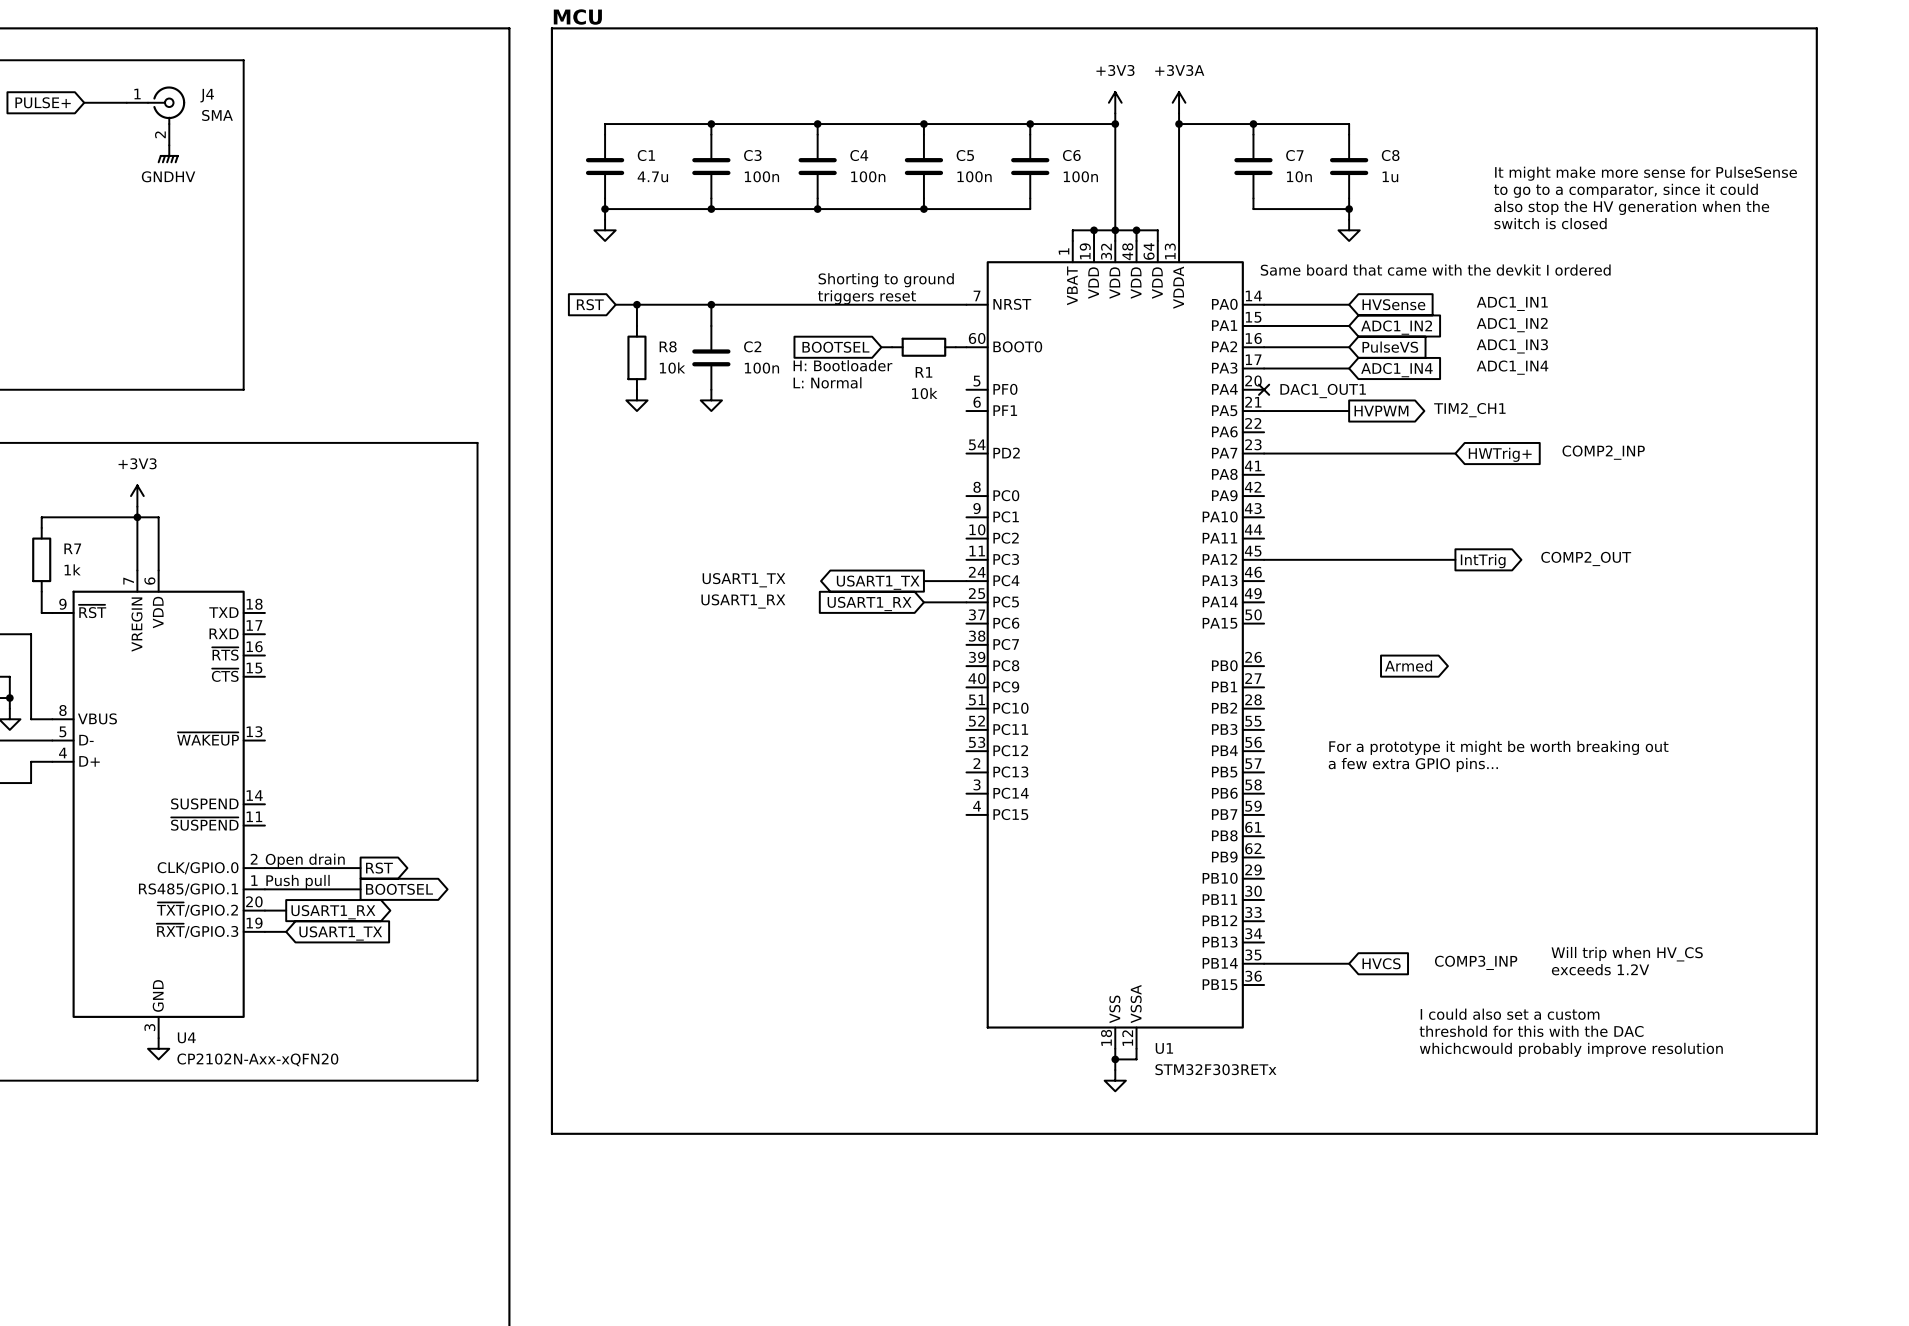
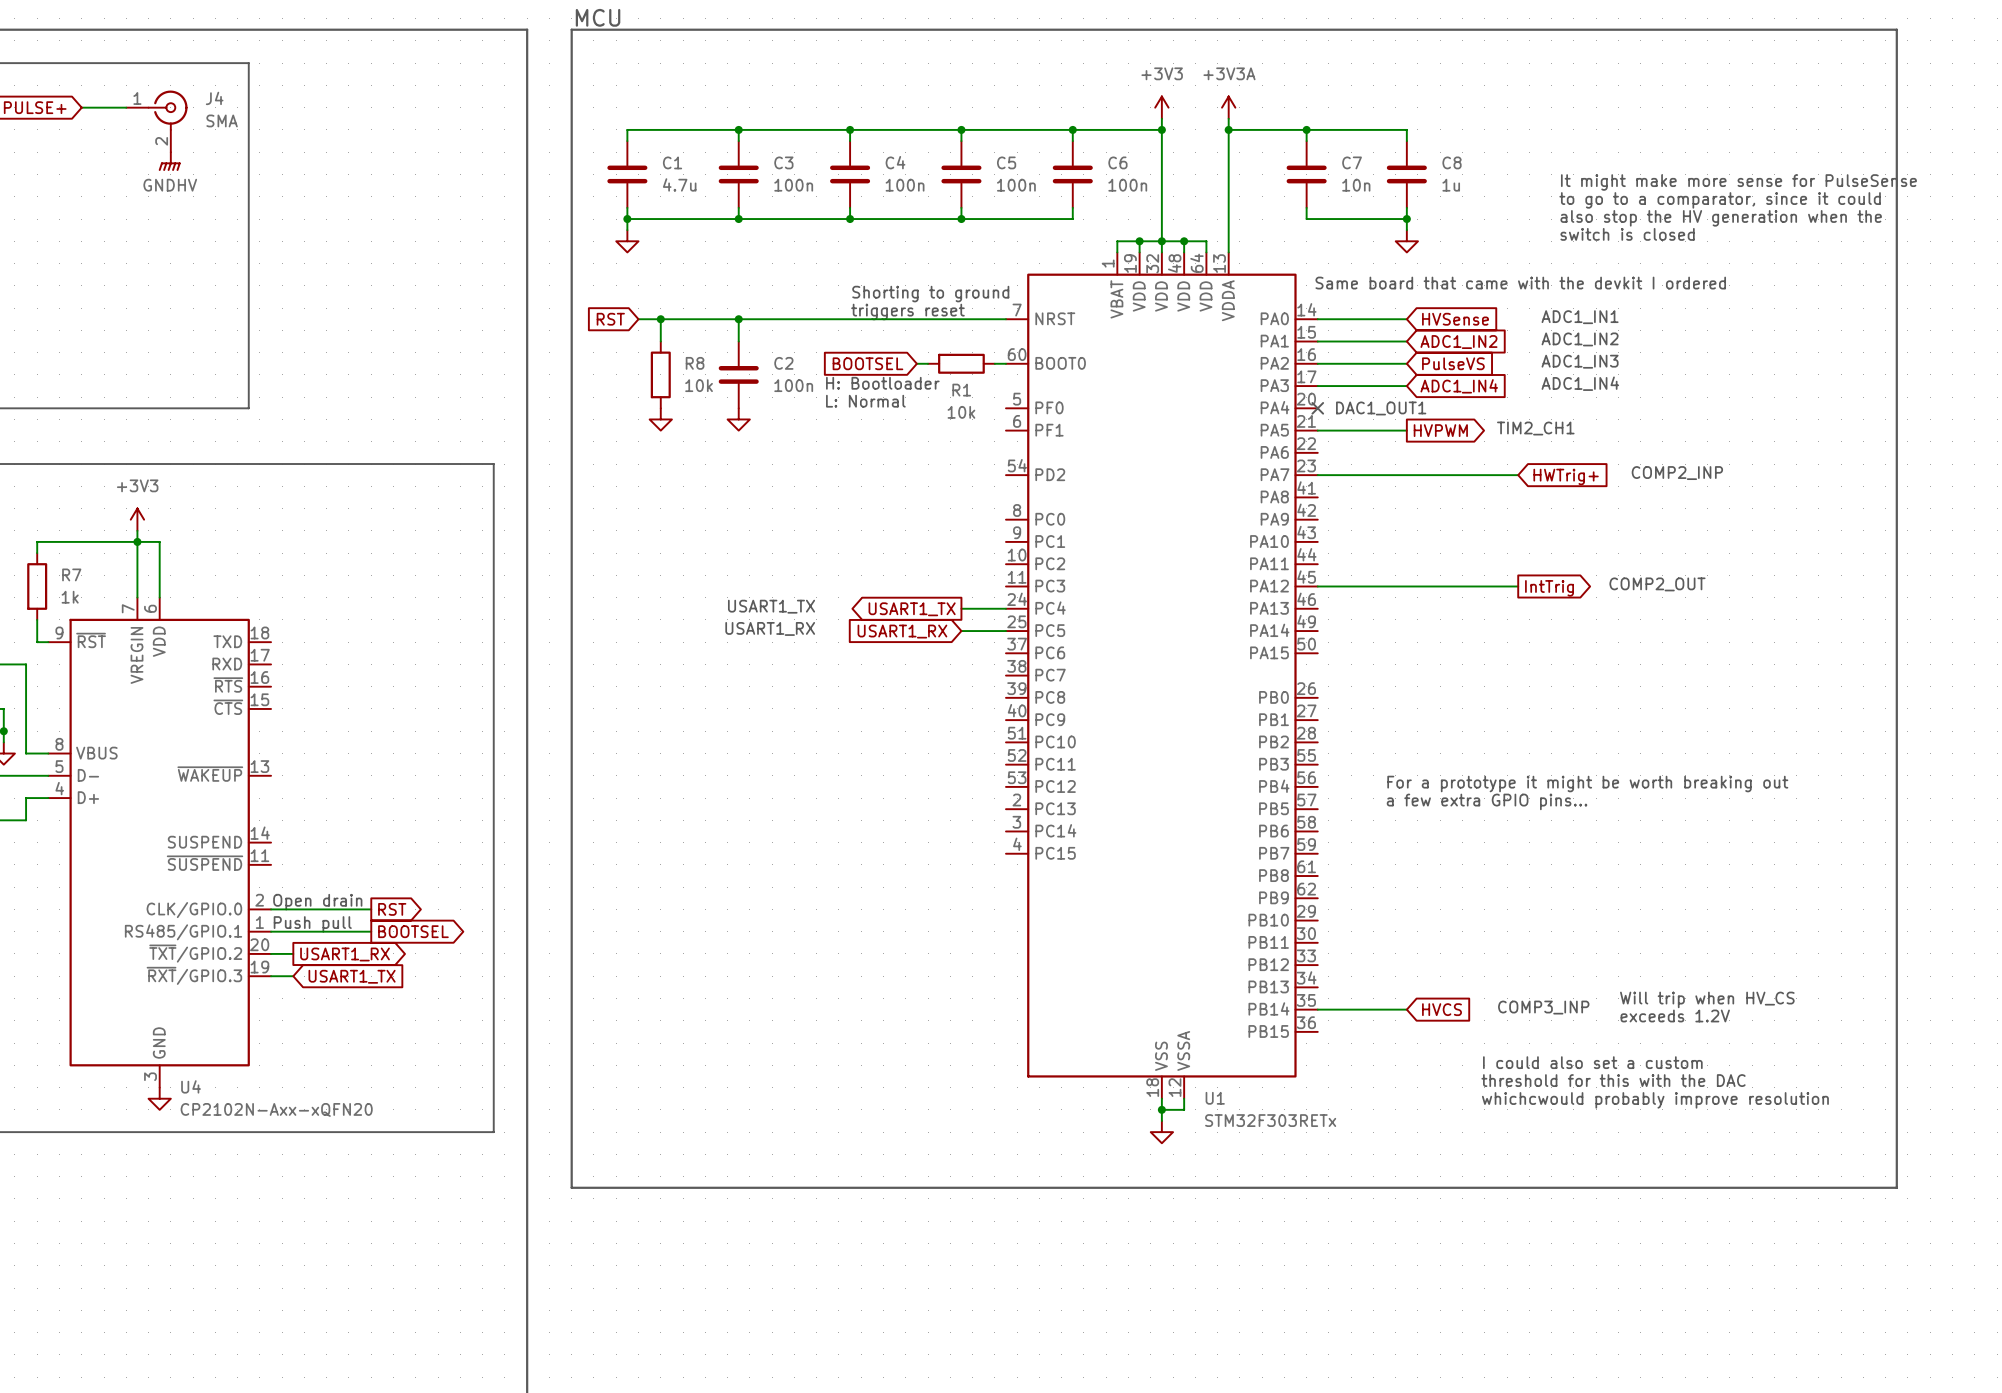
global label: Armed (1408, 666) -> none

